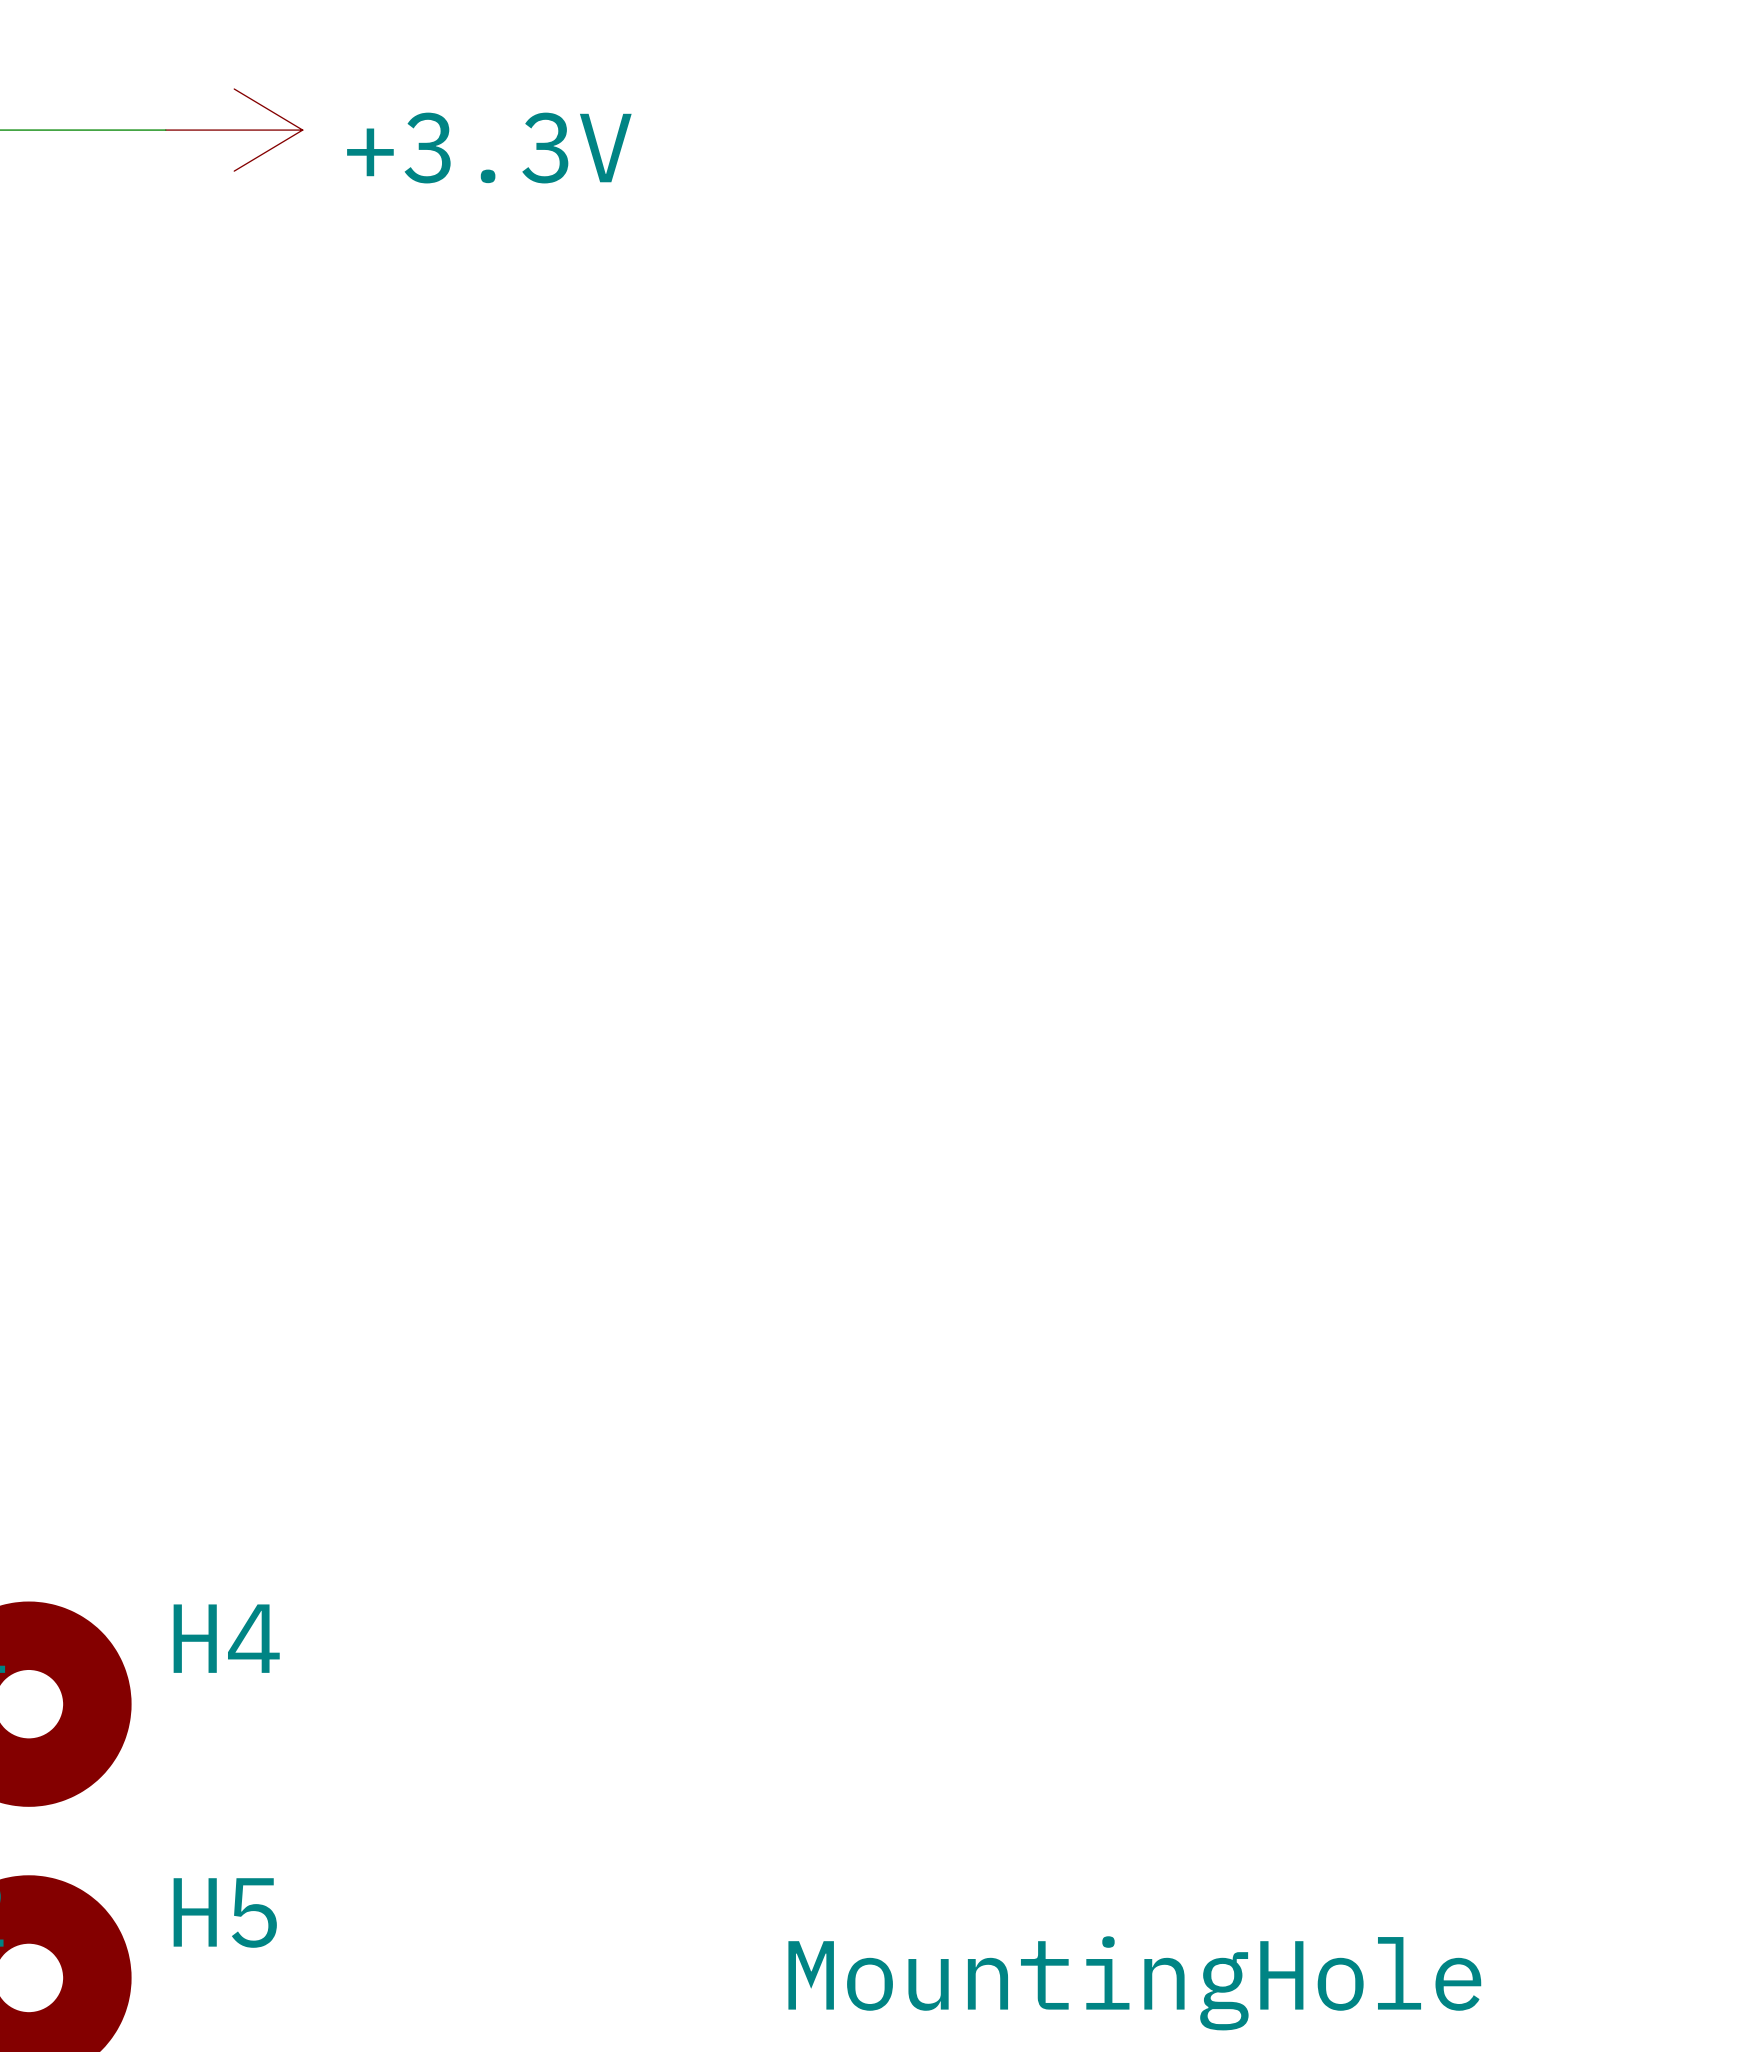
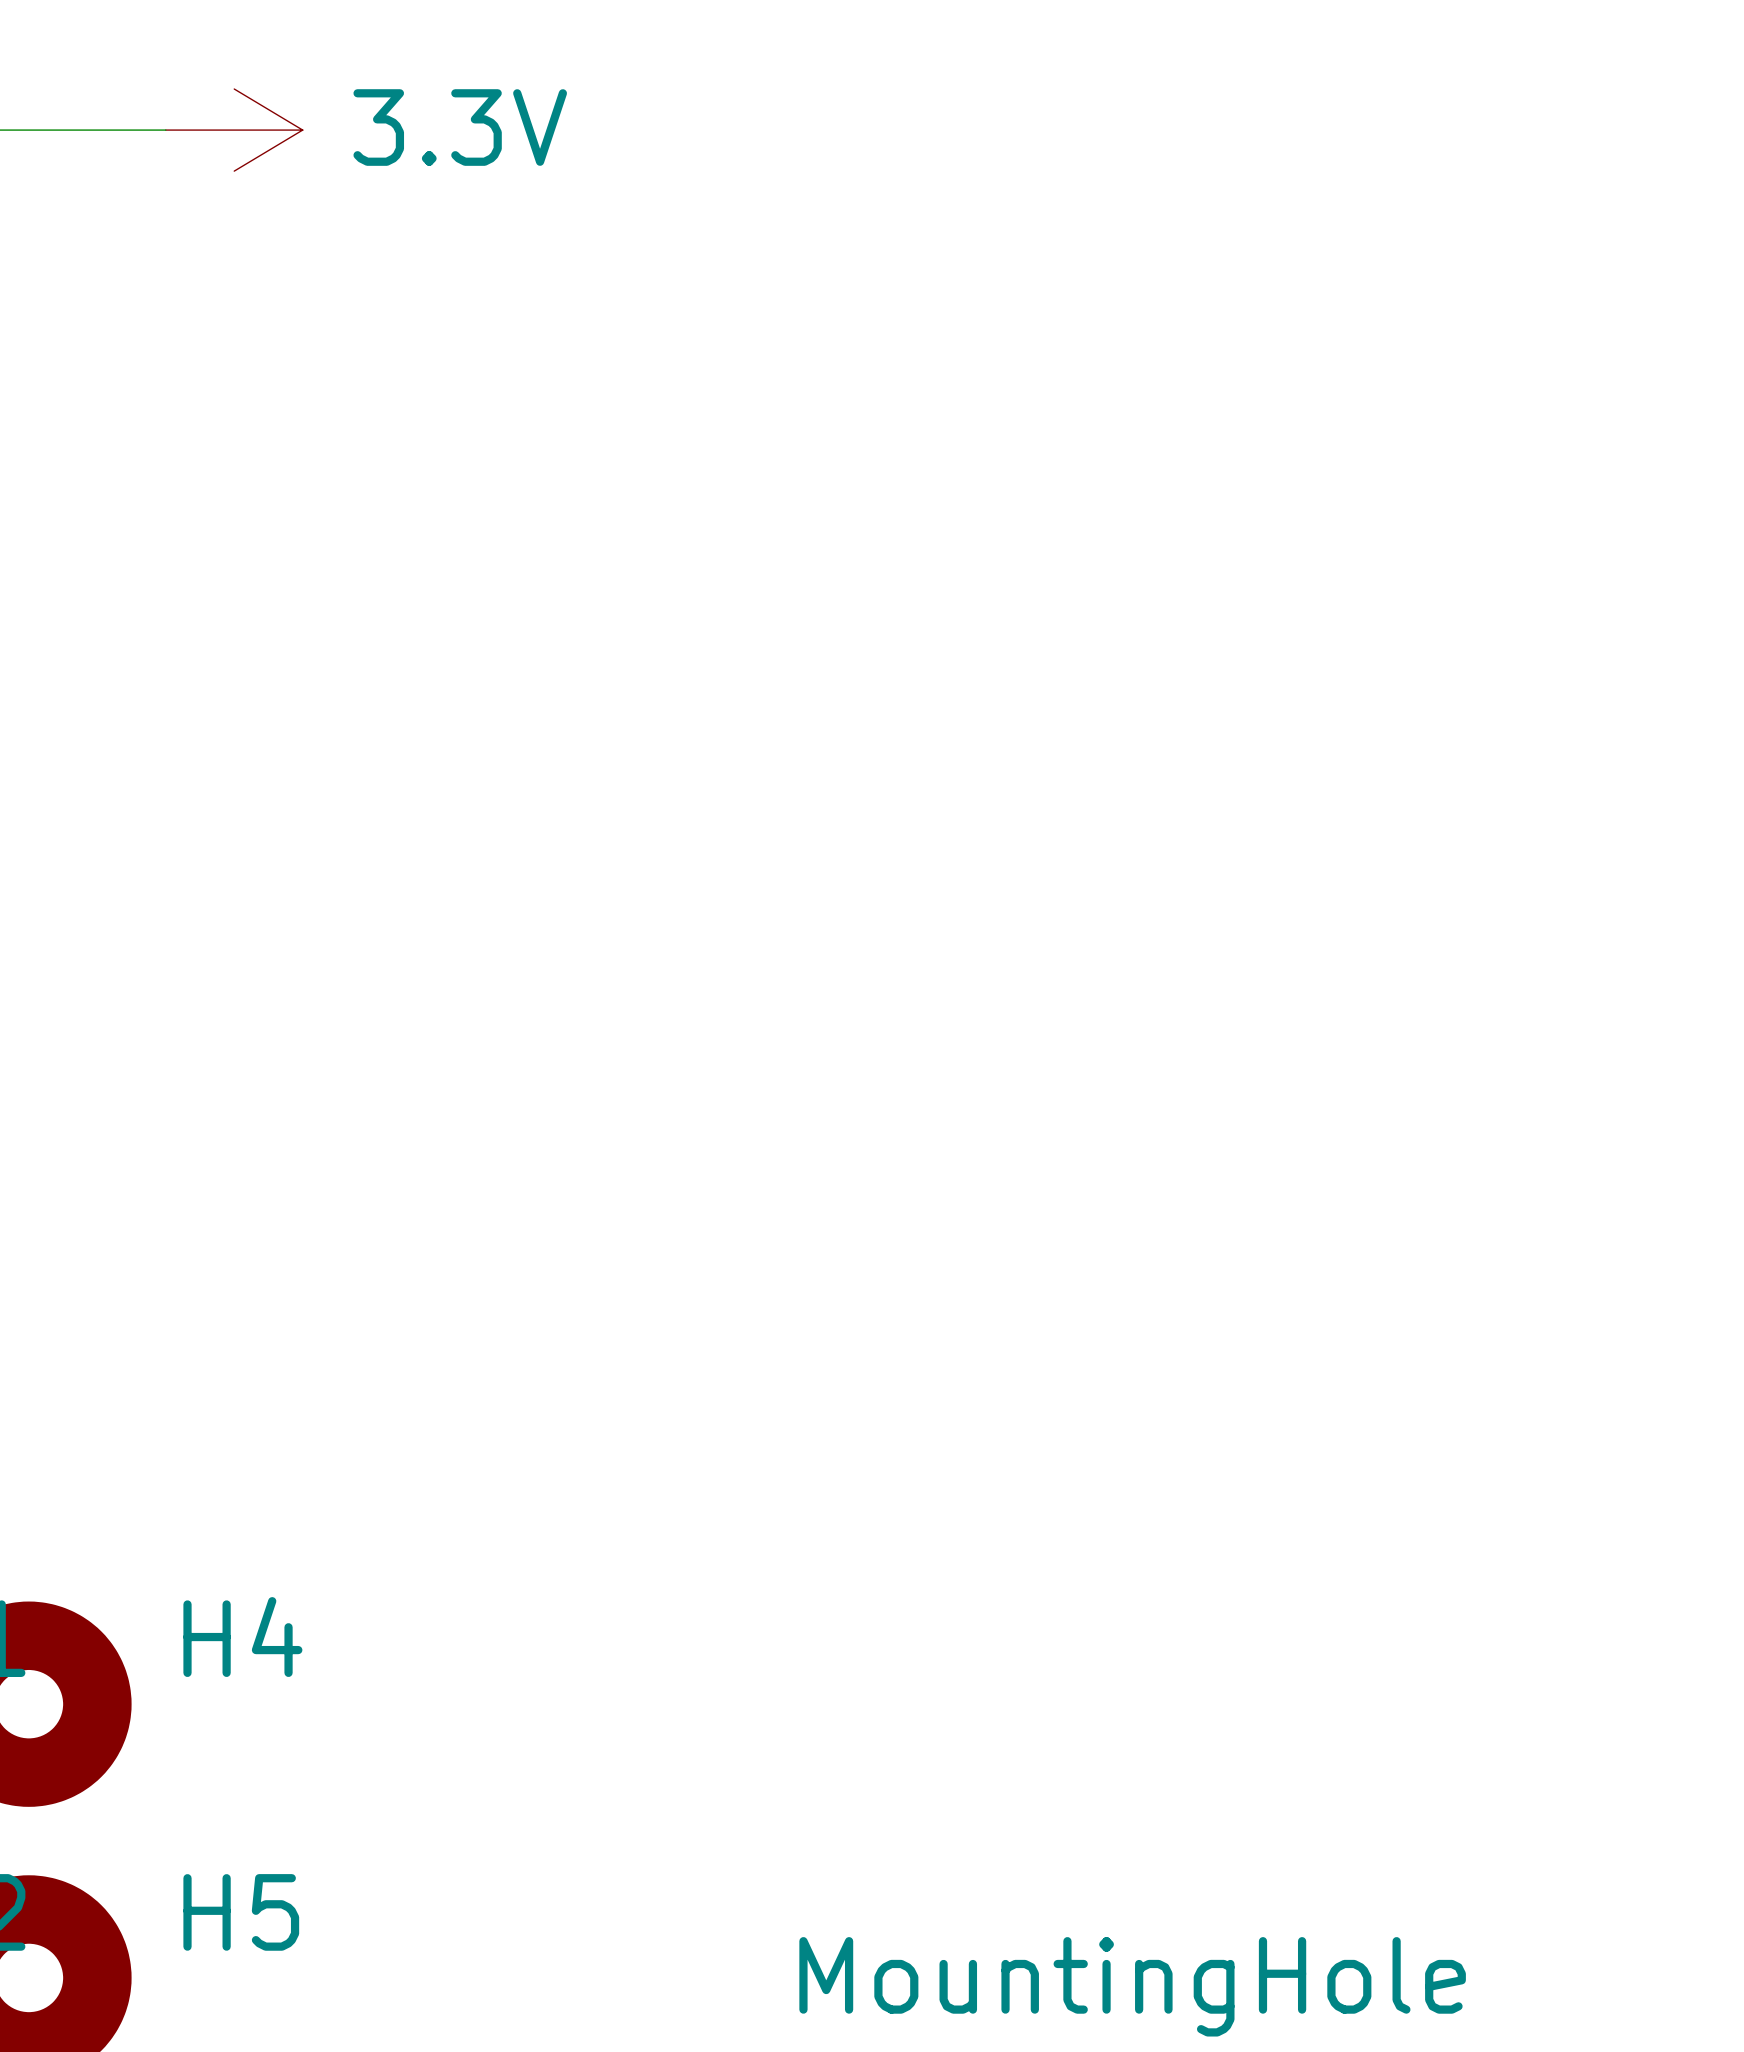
power symbol: +3.3V (234, 130) -> 3.3V (234, 130)

